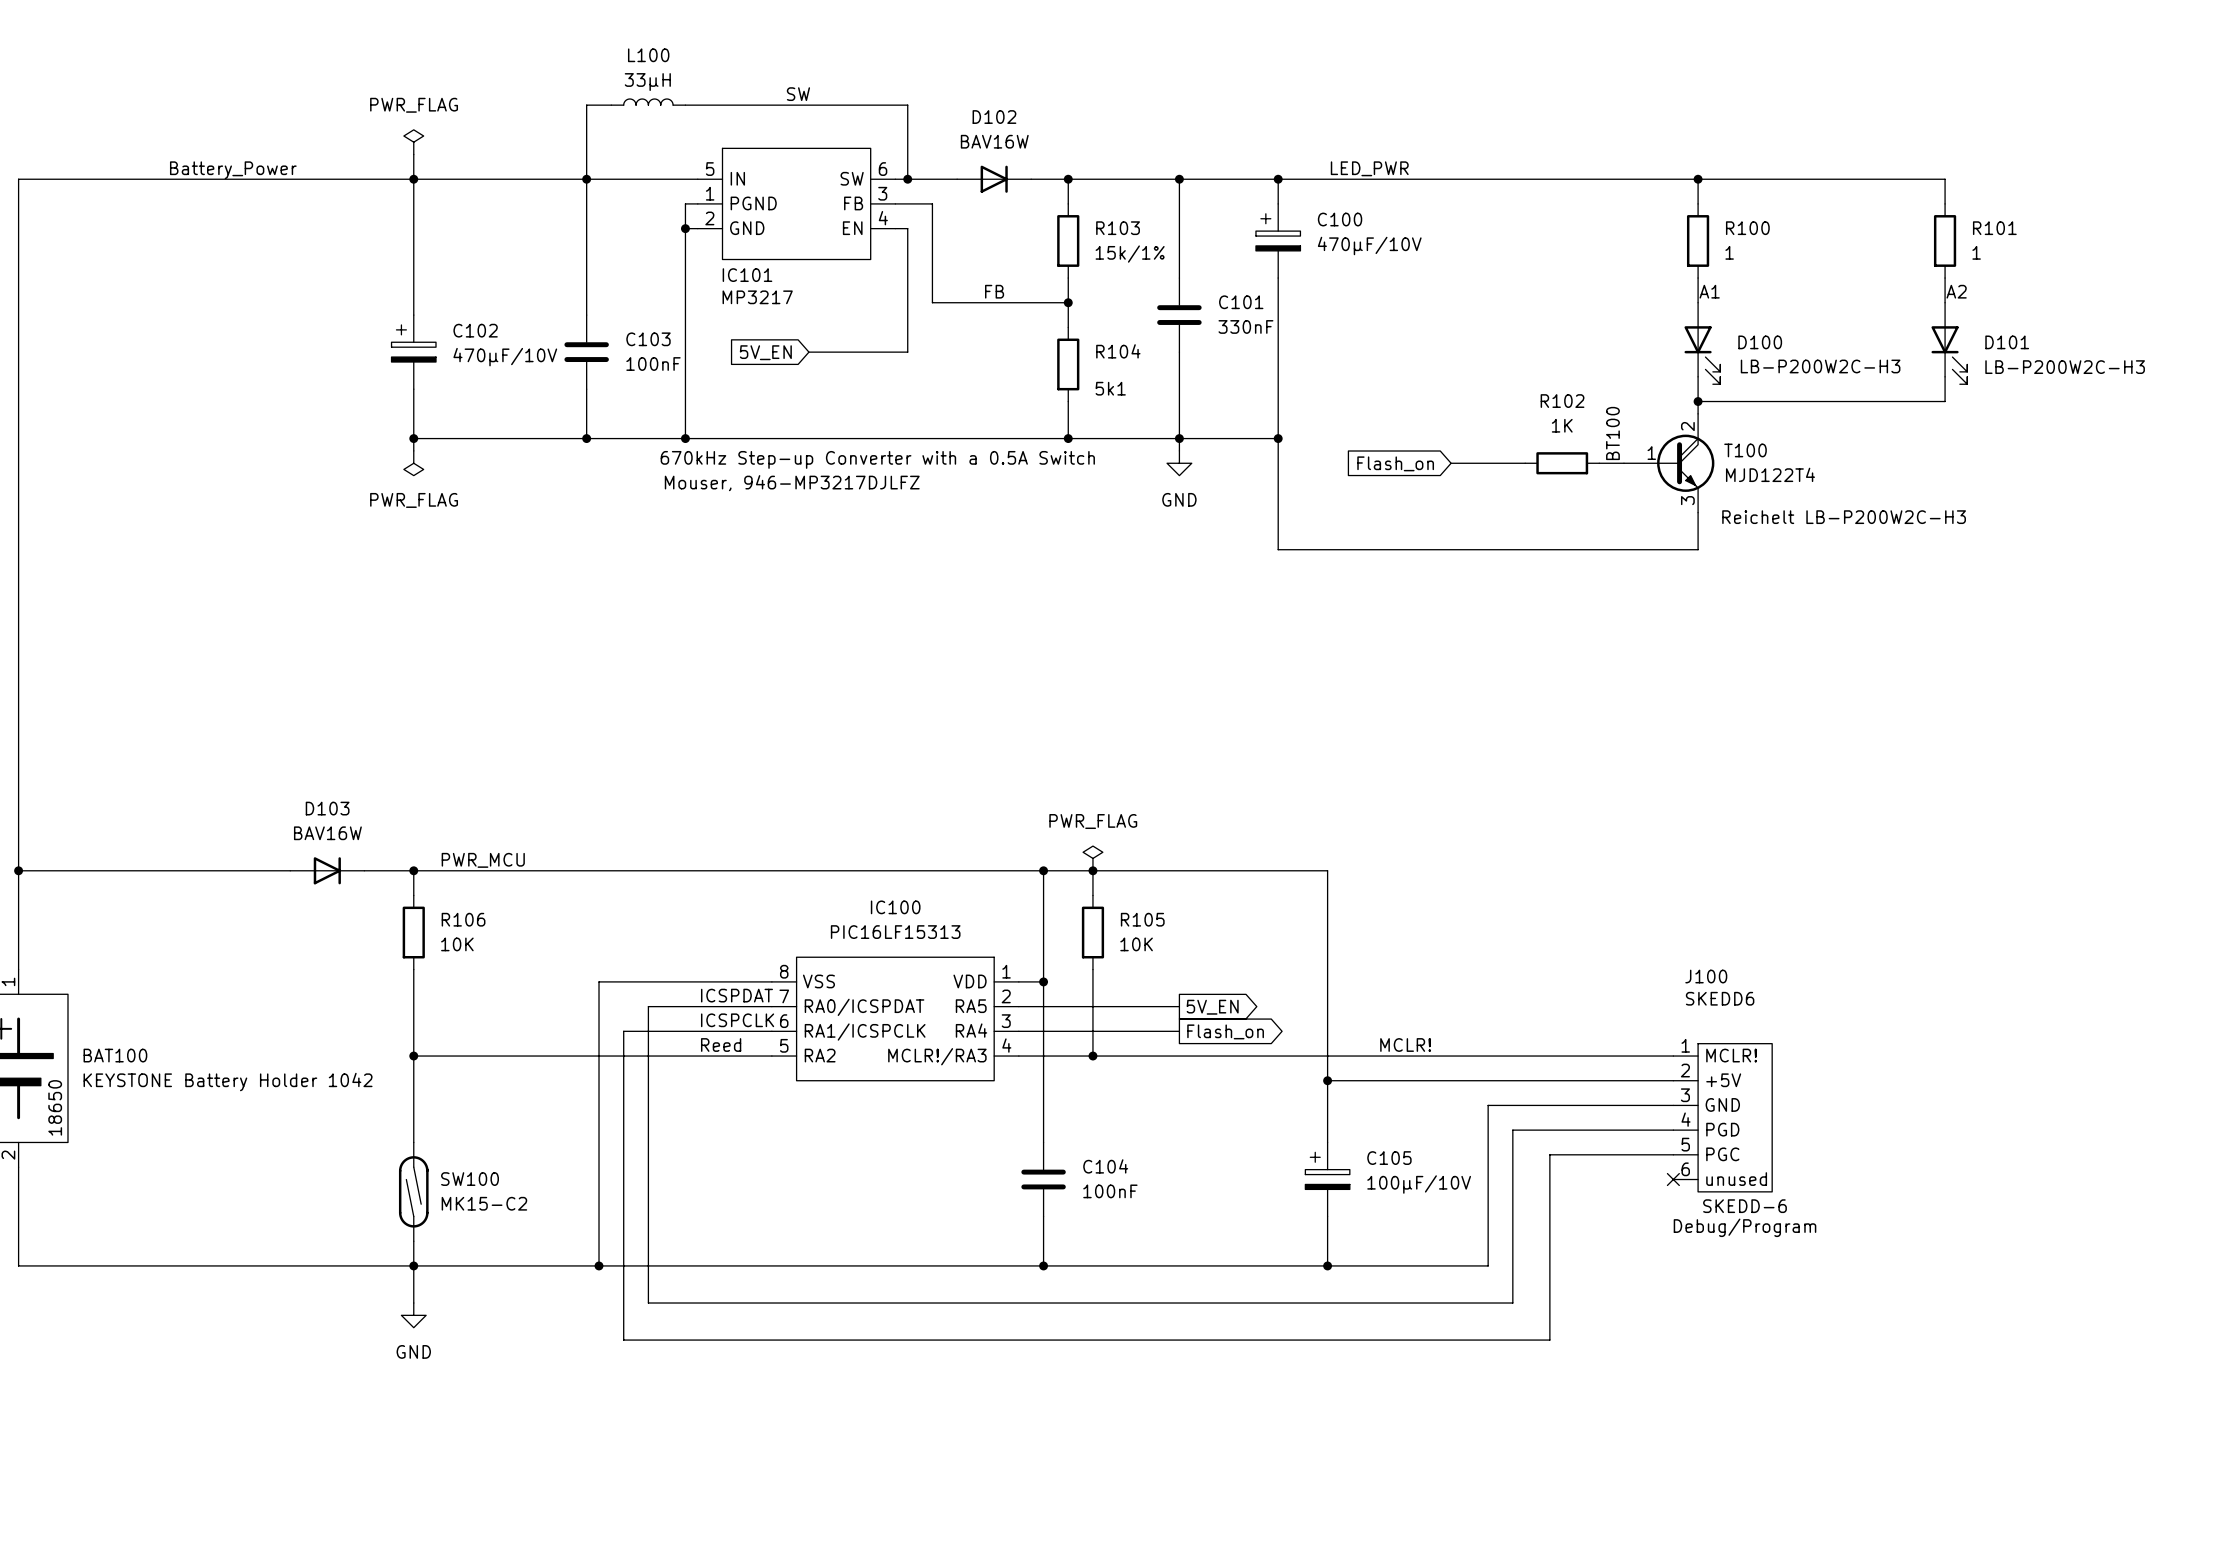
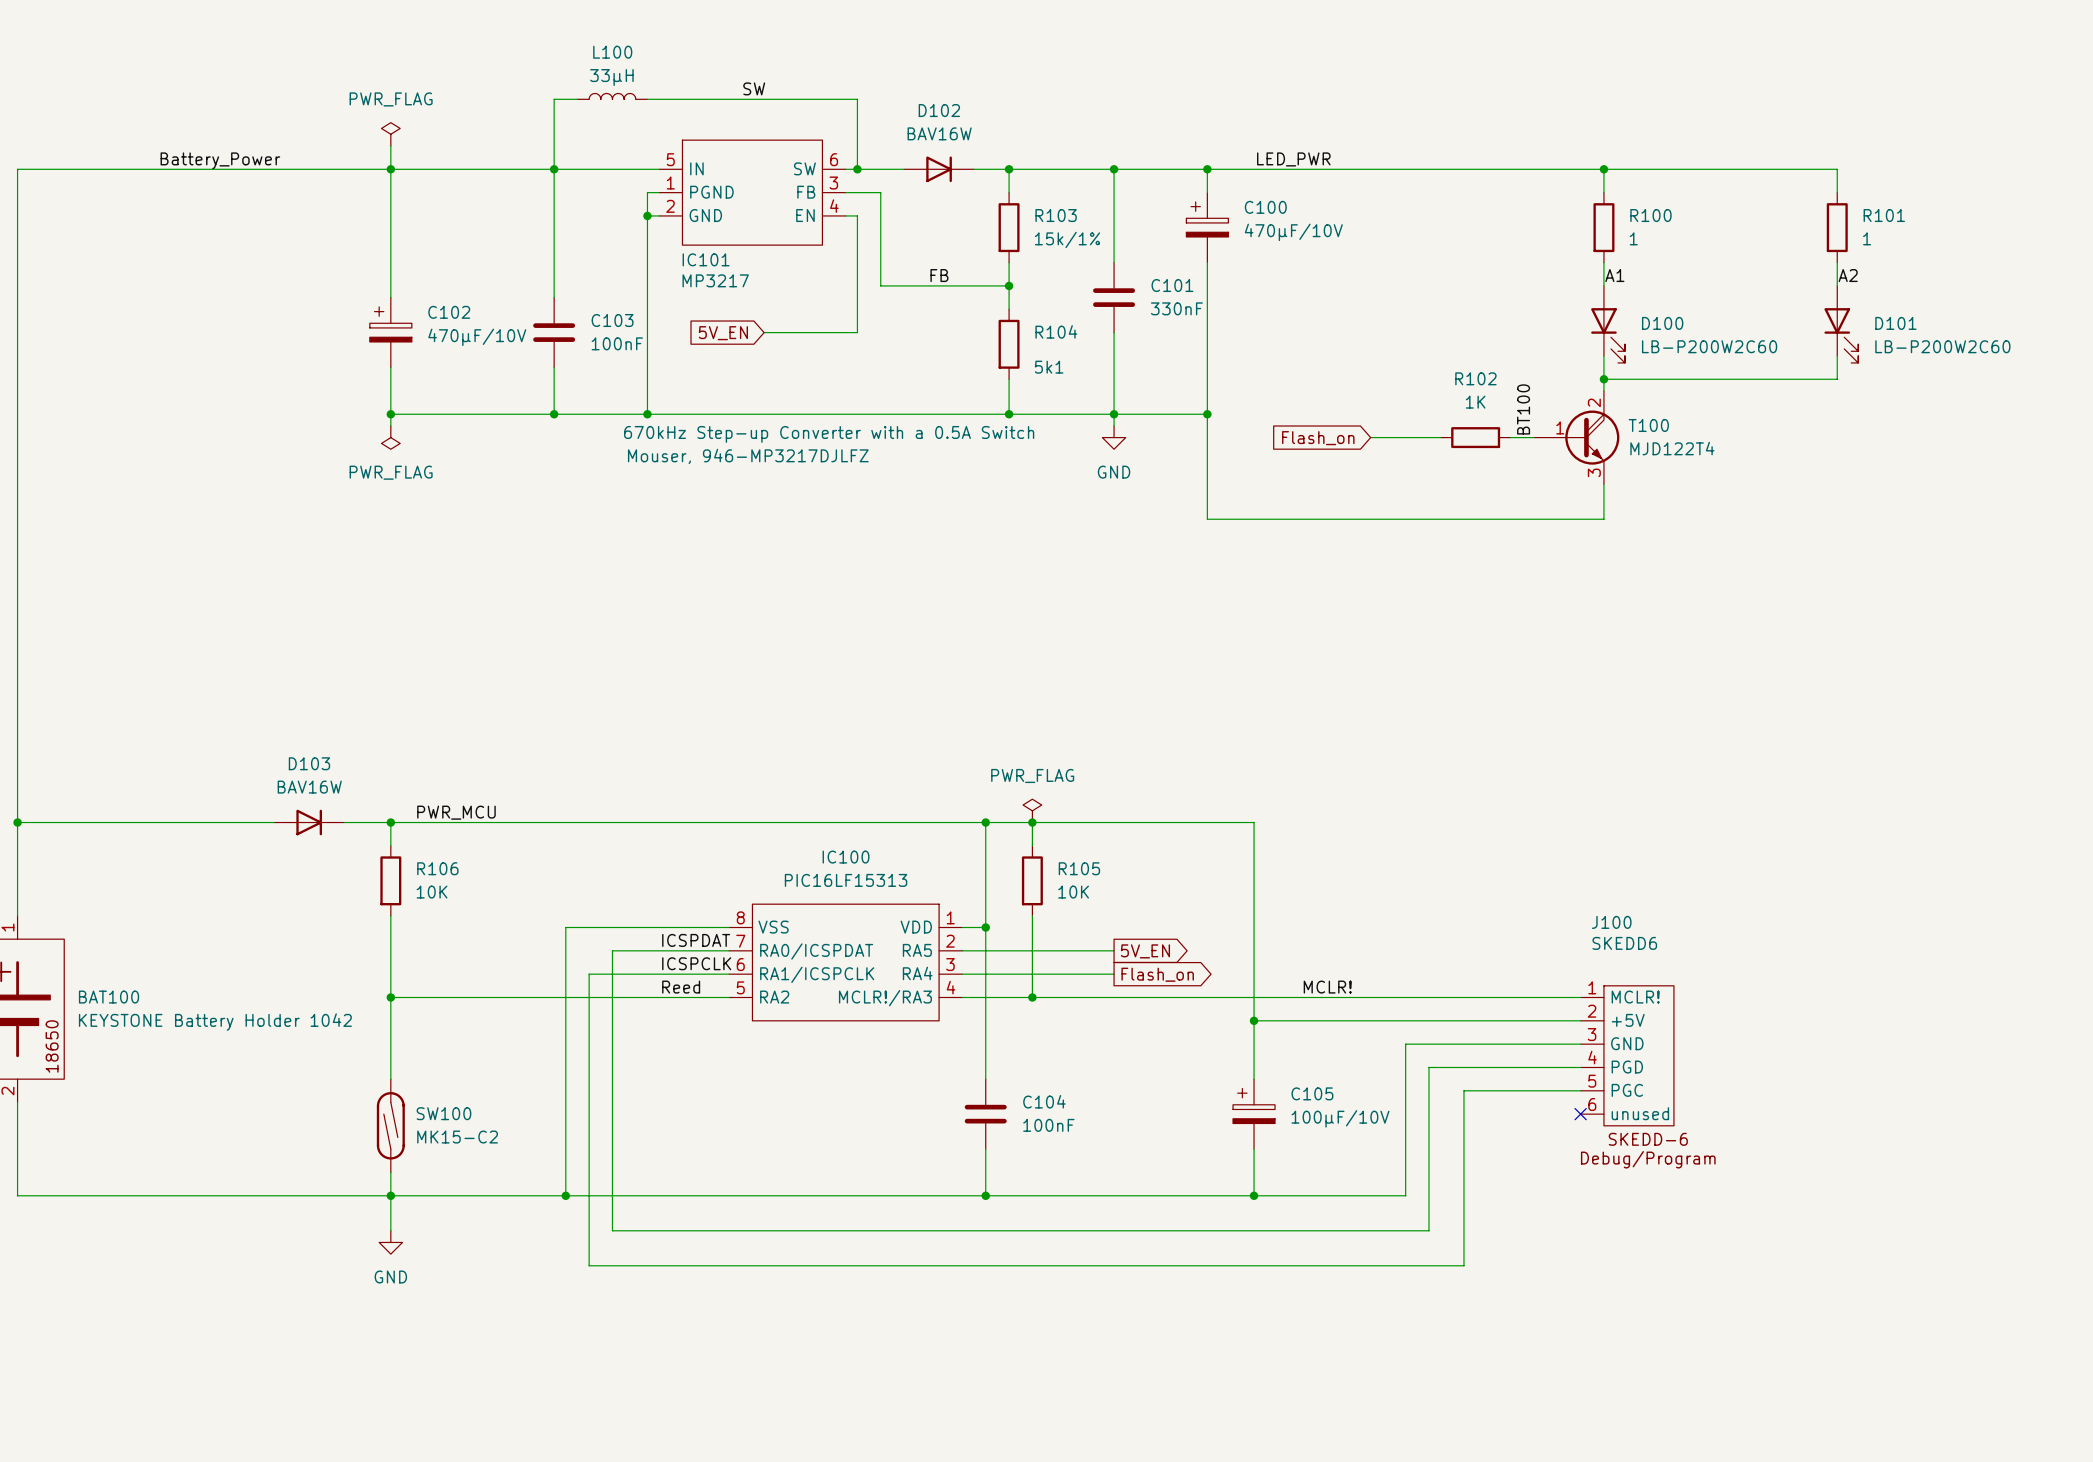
D100 value: LB-P200W2C-H3 (1820, 366) -> LB-P200W2C60 (1709, 346)
D101 value: LB-P200W2C-H3 (2065, 367) -> LB-P200W2C60 (1942, 346)
D100 text: Reichelt LB-P200W2C-H3 (1844, 517) -> none

